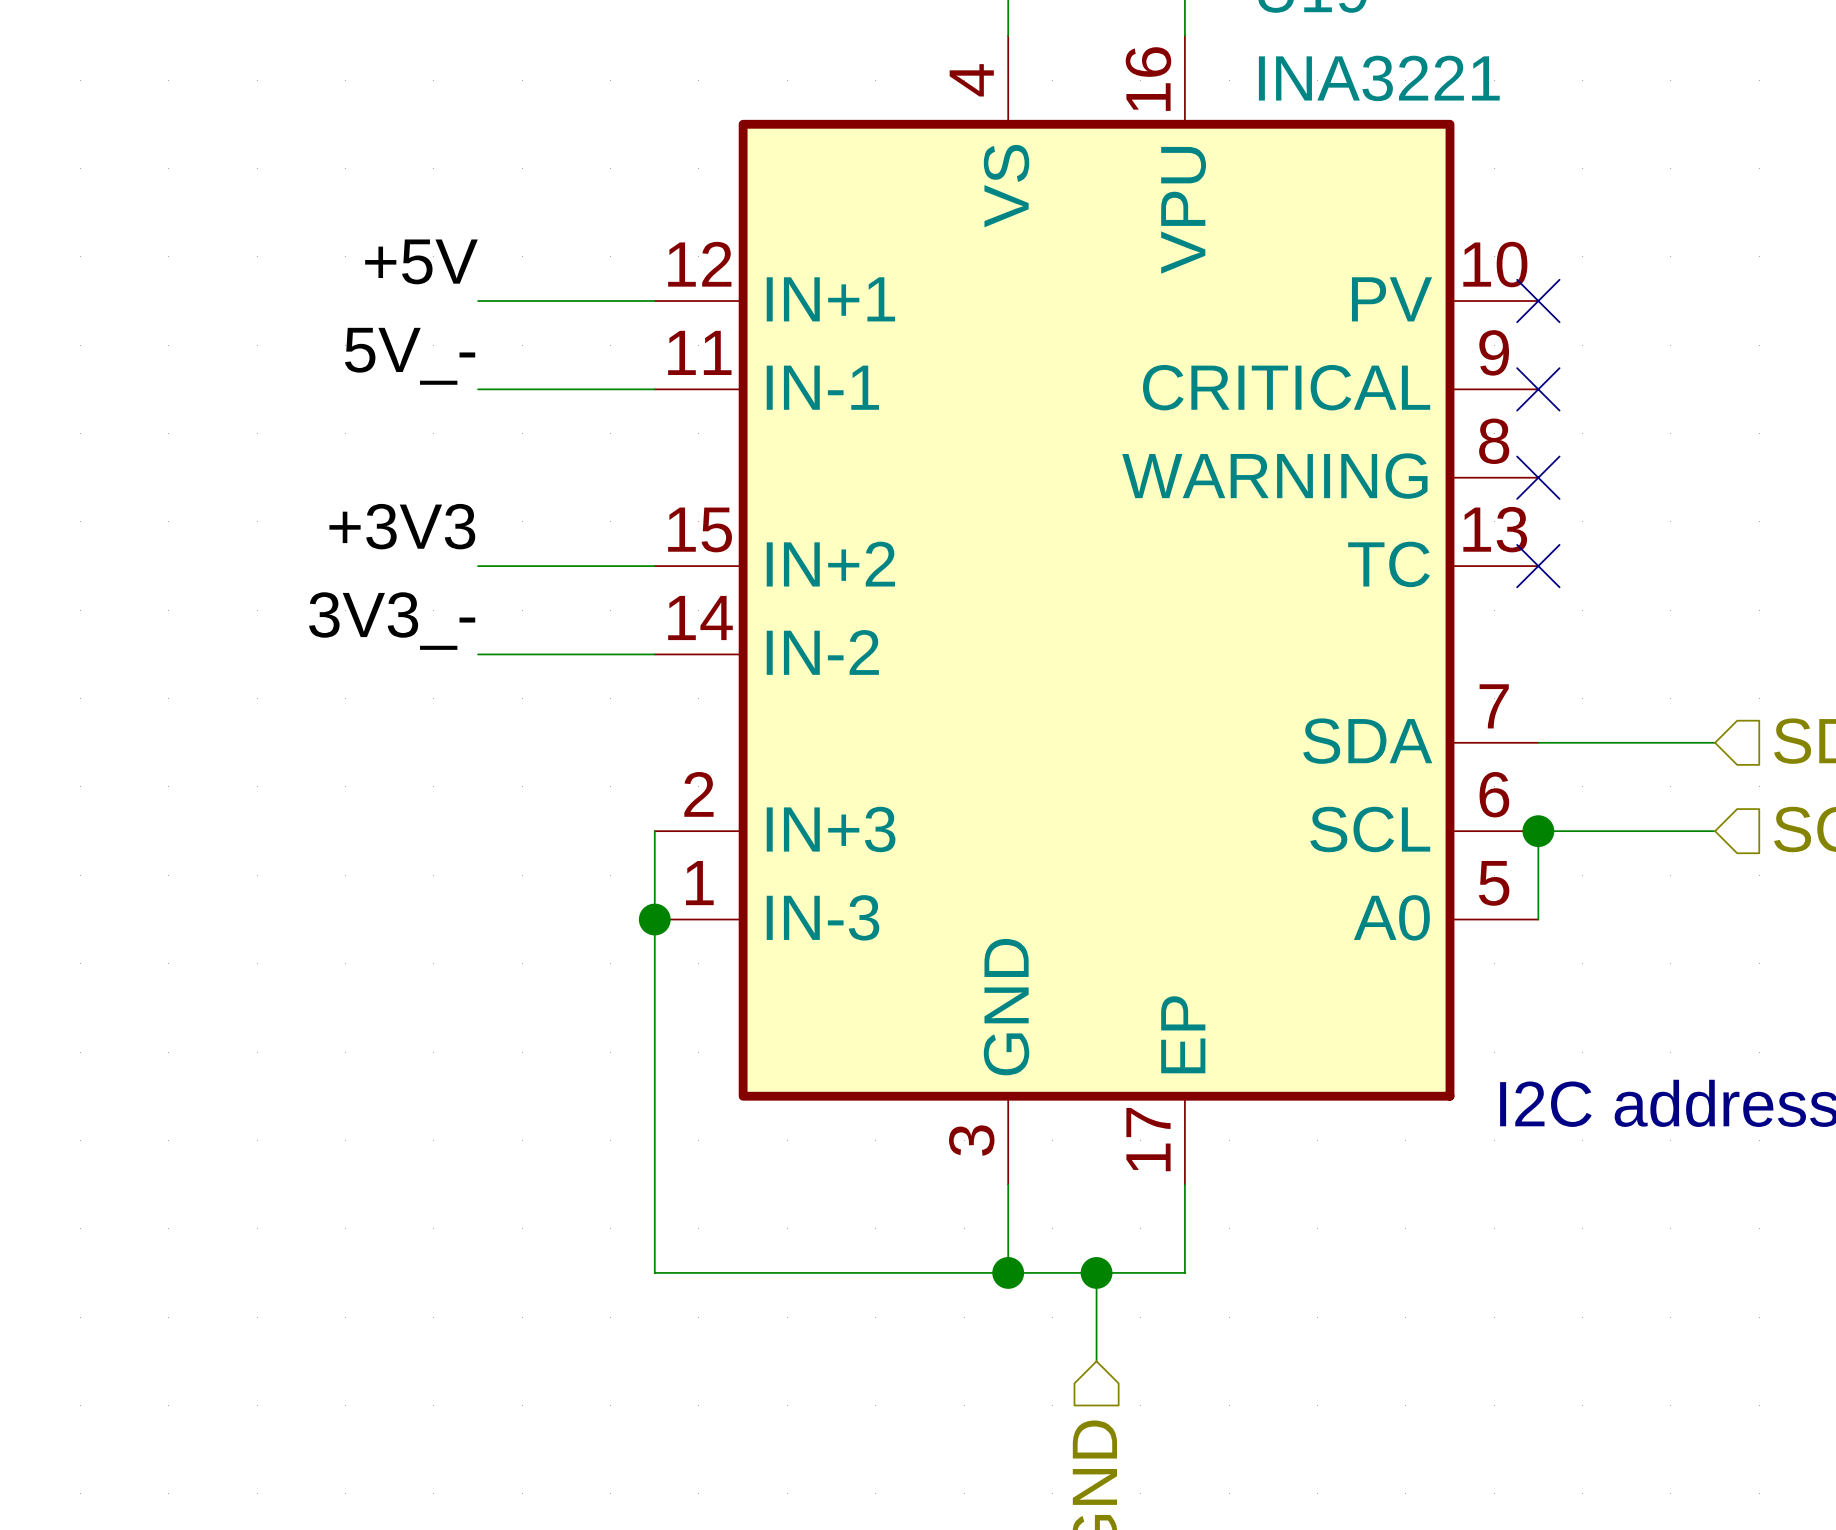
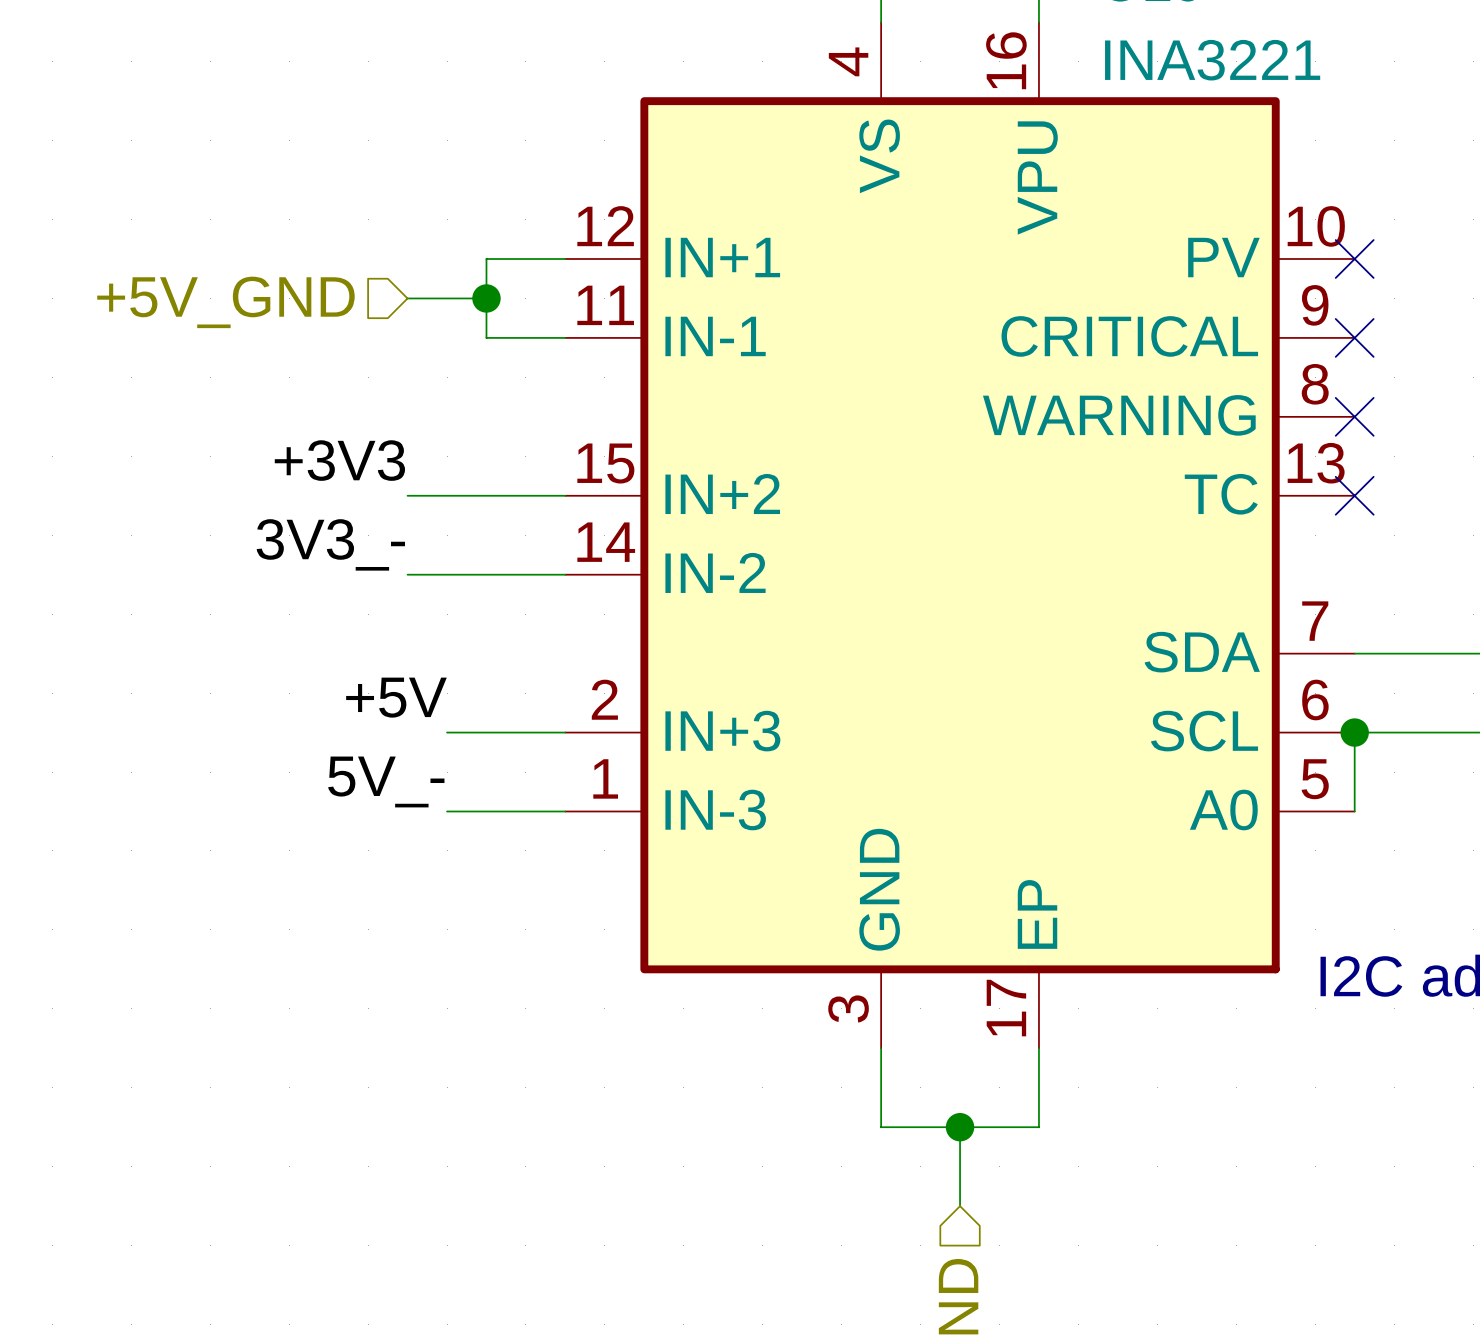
label position: +5V (421, 261) -> +5V (396, 697)
wire: (478, 301) (566, 301) -> (486, 337) (486, 259)
junction: none -> (486, 298)
hierarchical label: none -> +5V_GND (225, 302)
label position: 5V_- (410, 356) -> 5V_- (386, 781)
wire: (478, 389) (566, 389) -> (407, 298) (486, 298)
wire: (654, 831) (654, 1272) (1008, 1272) -> (565, 732) (447, 732)
wire: none -> (447, 811) (565, 811)
junction: (654, 919) -> none
junction: (1008, 1272) -> none

